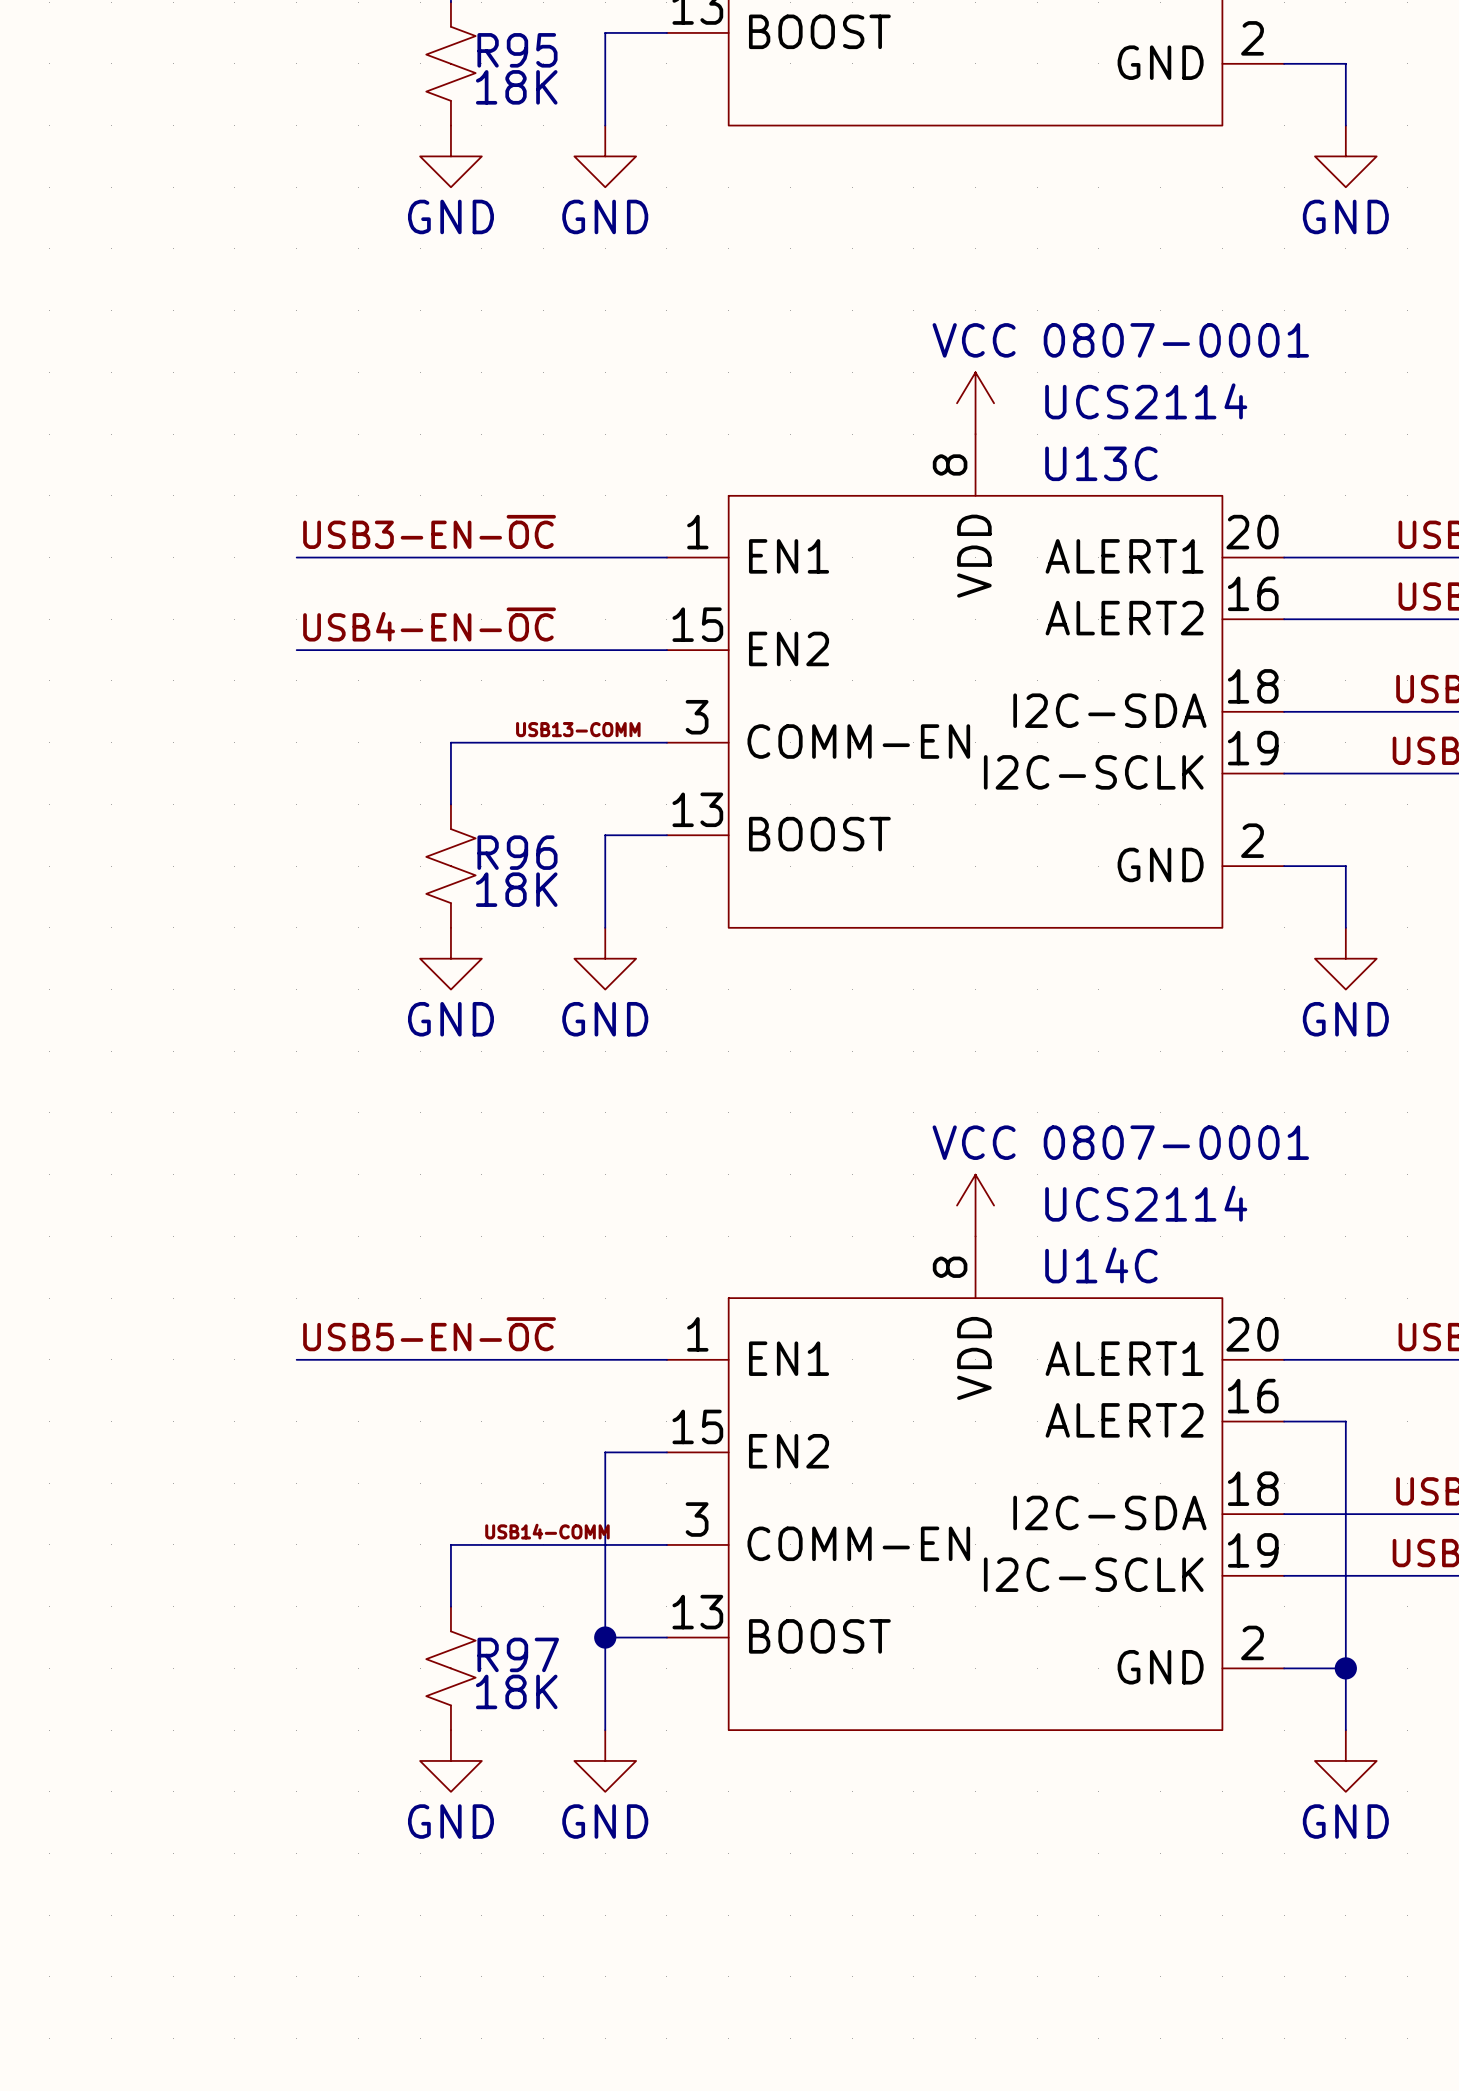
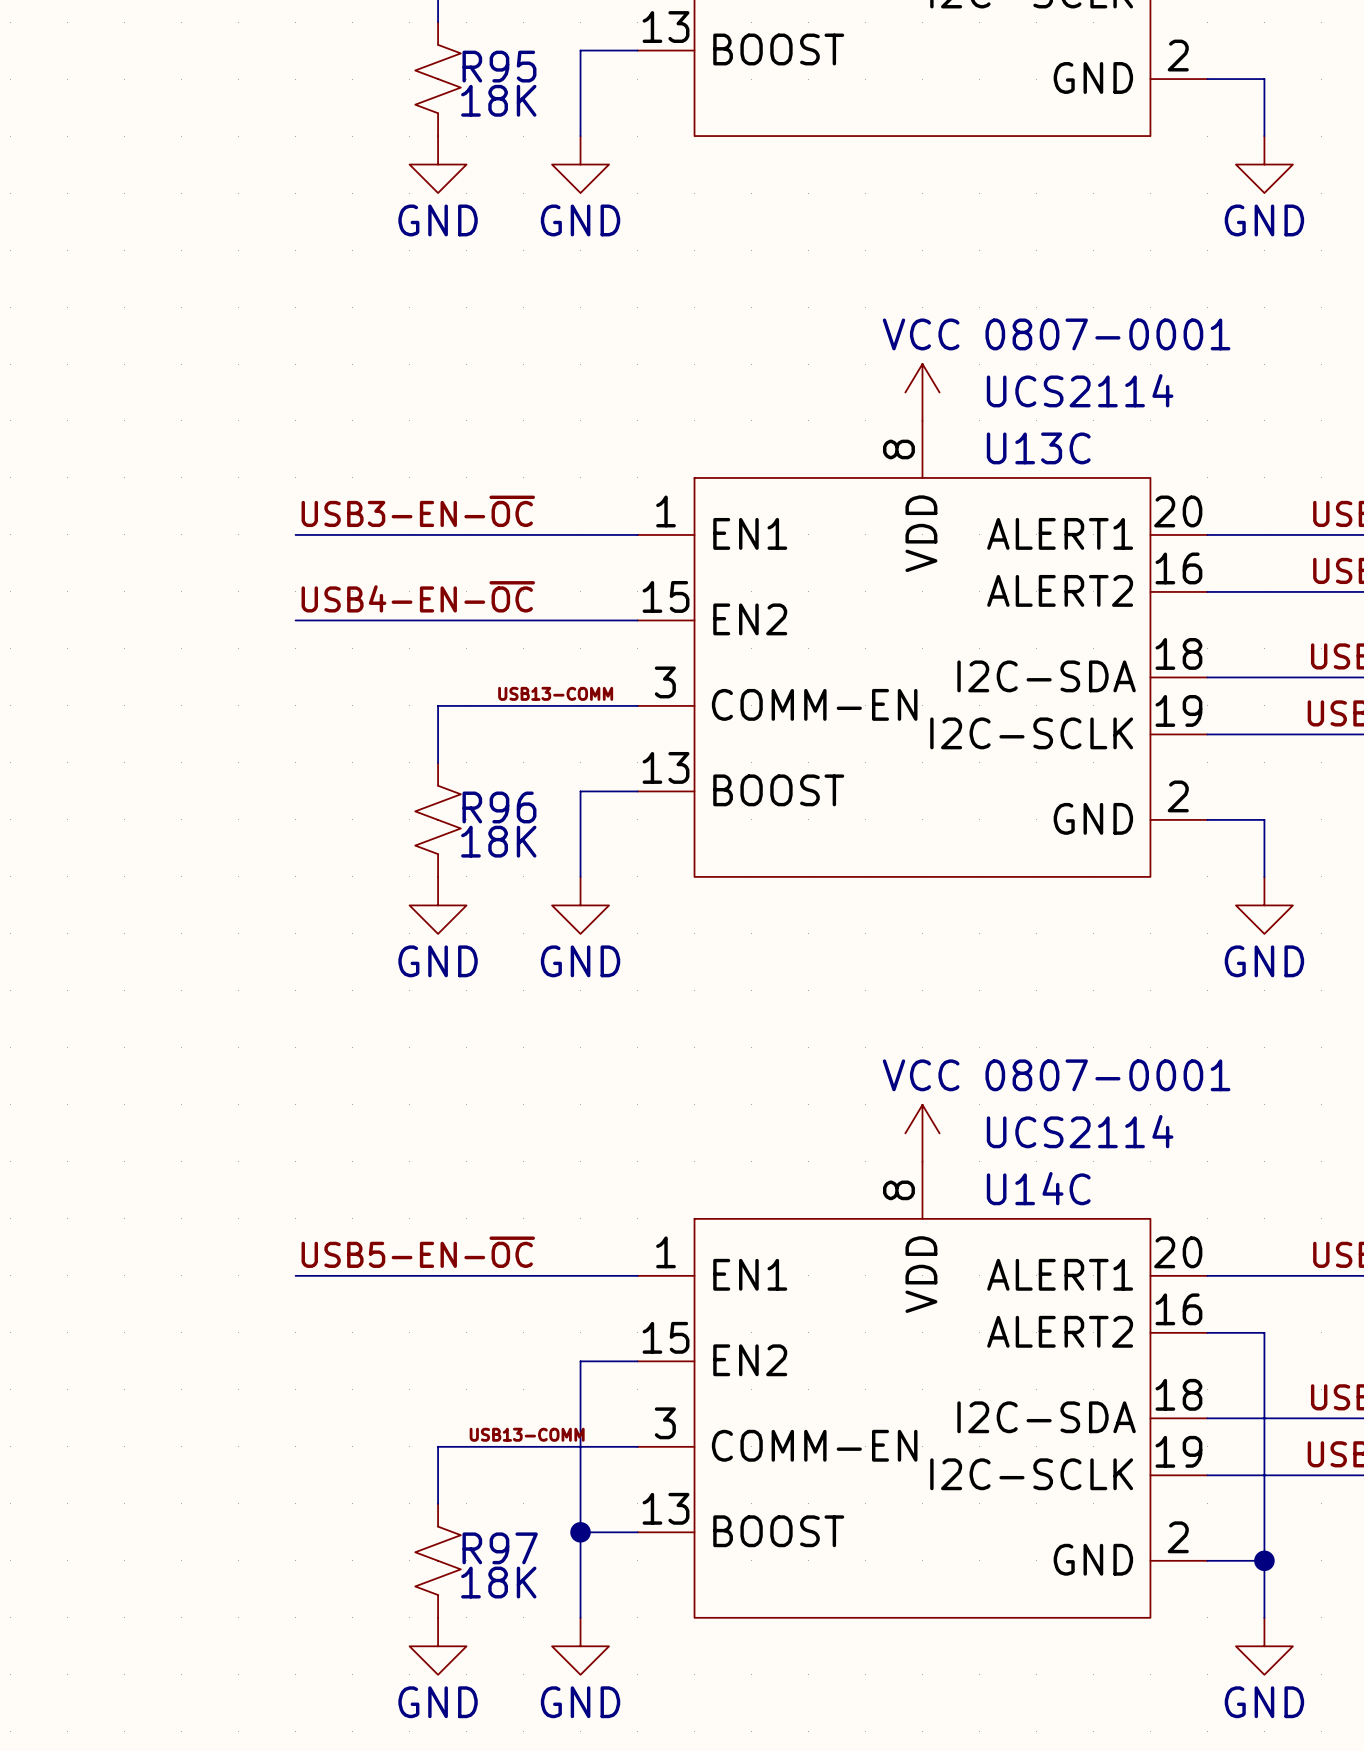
label: USB14-COMM (547, 1531) -> USB13-COMM (527, 1434)

